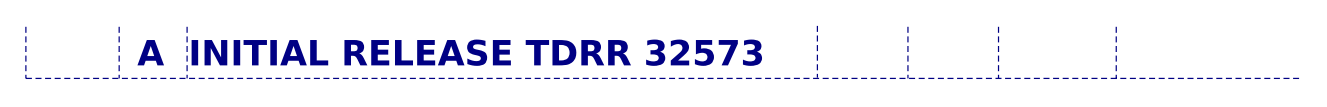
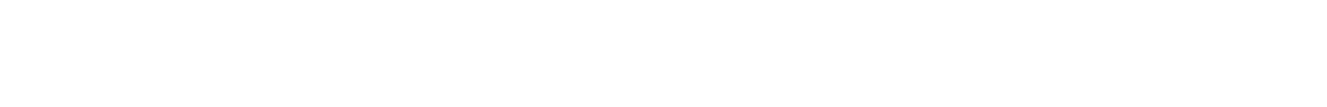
line: (817, 25) (817, 77) -> none
line: (25, 26) (25, 78) (1300, 78) -> none
line: (119, 26) (119, 78) -> none
line: (187, 26) (187, 78) -> none
line: (907, 26) (907, 78) -> none
line: (998, 26) (998, 78) -> none
line: (1116, 26) (1116, 78) -> none
text: A INITIAL RELEASE TDRR 32573 (449, 52) -> none

